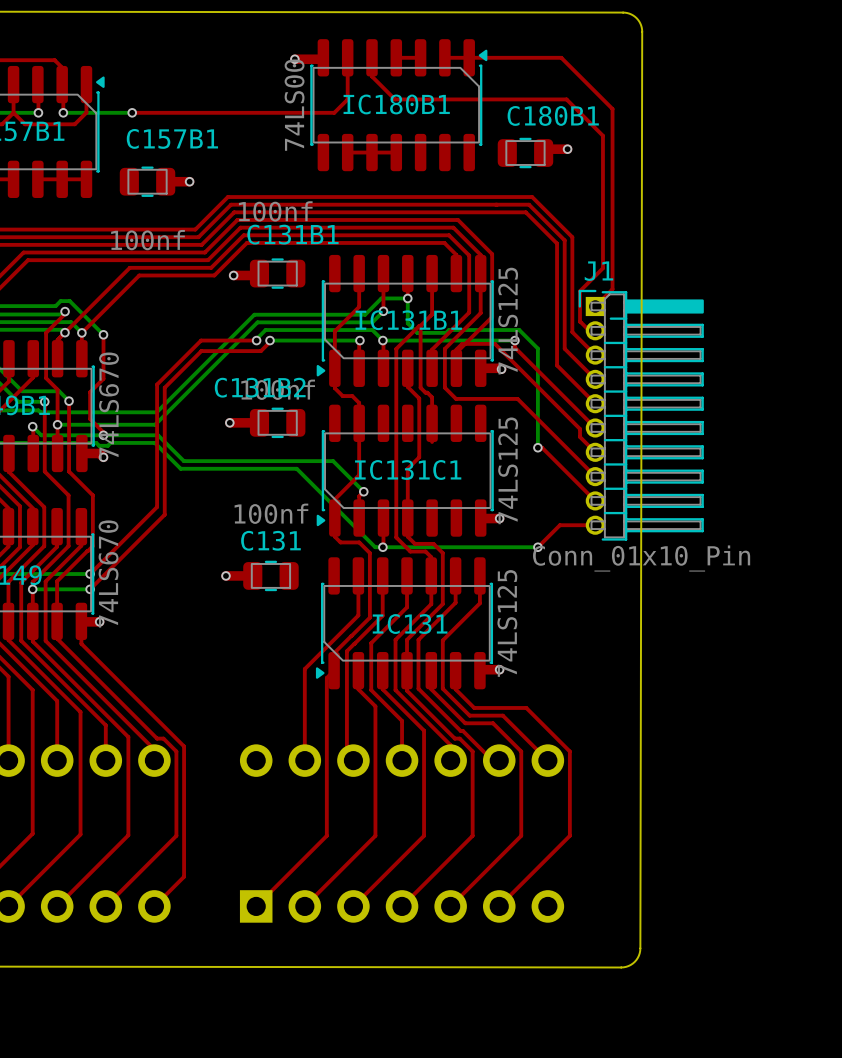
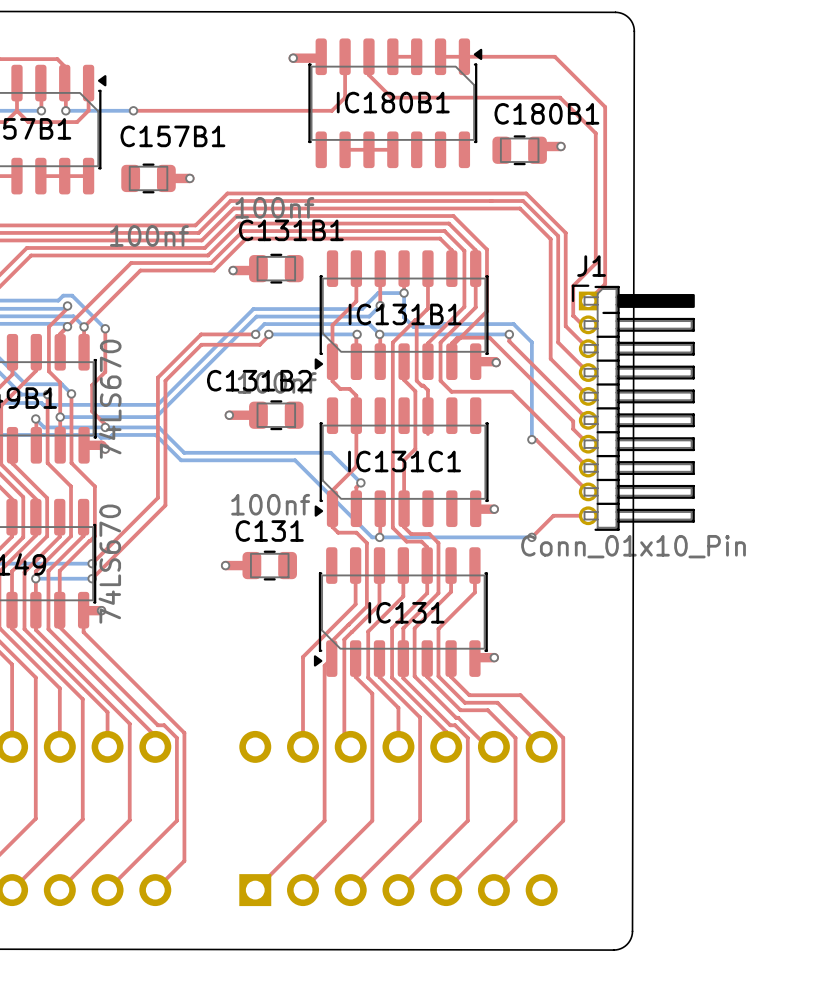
IC180B1 value: 74LS00 (294, 105) -> none
IC131B1 value: 74LS125 (508, 321) -> none
IC131C1 value: 74LS125 (508, 470) -> none
IC131 value: 74LS125 (507, 623) -> none

